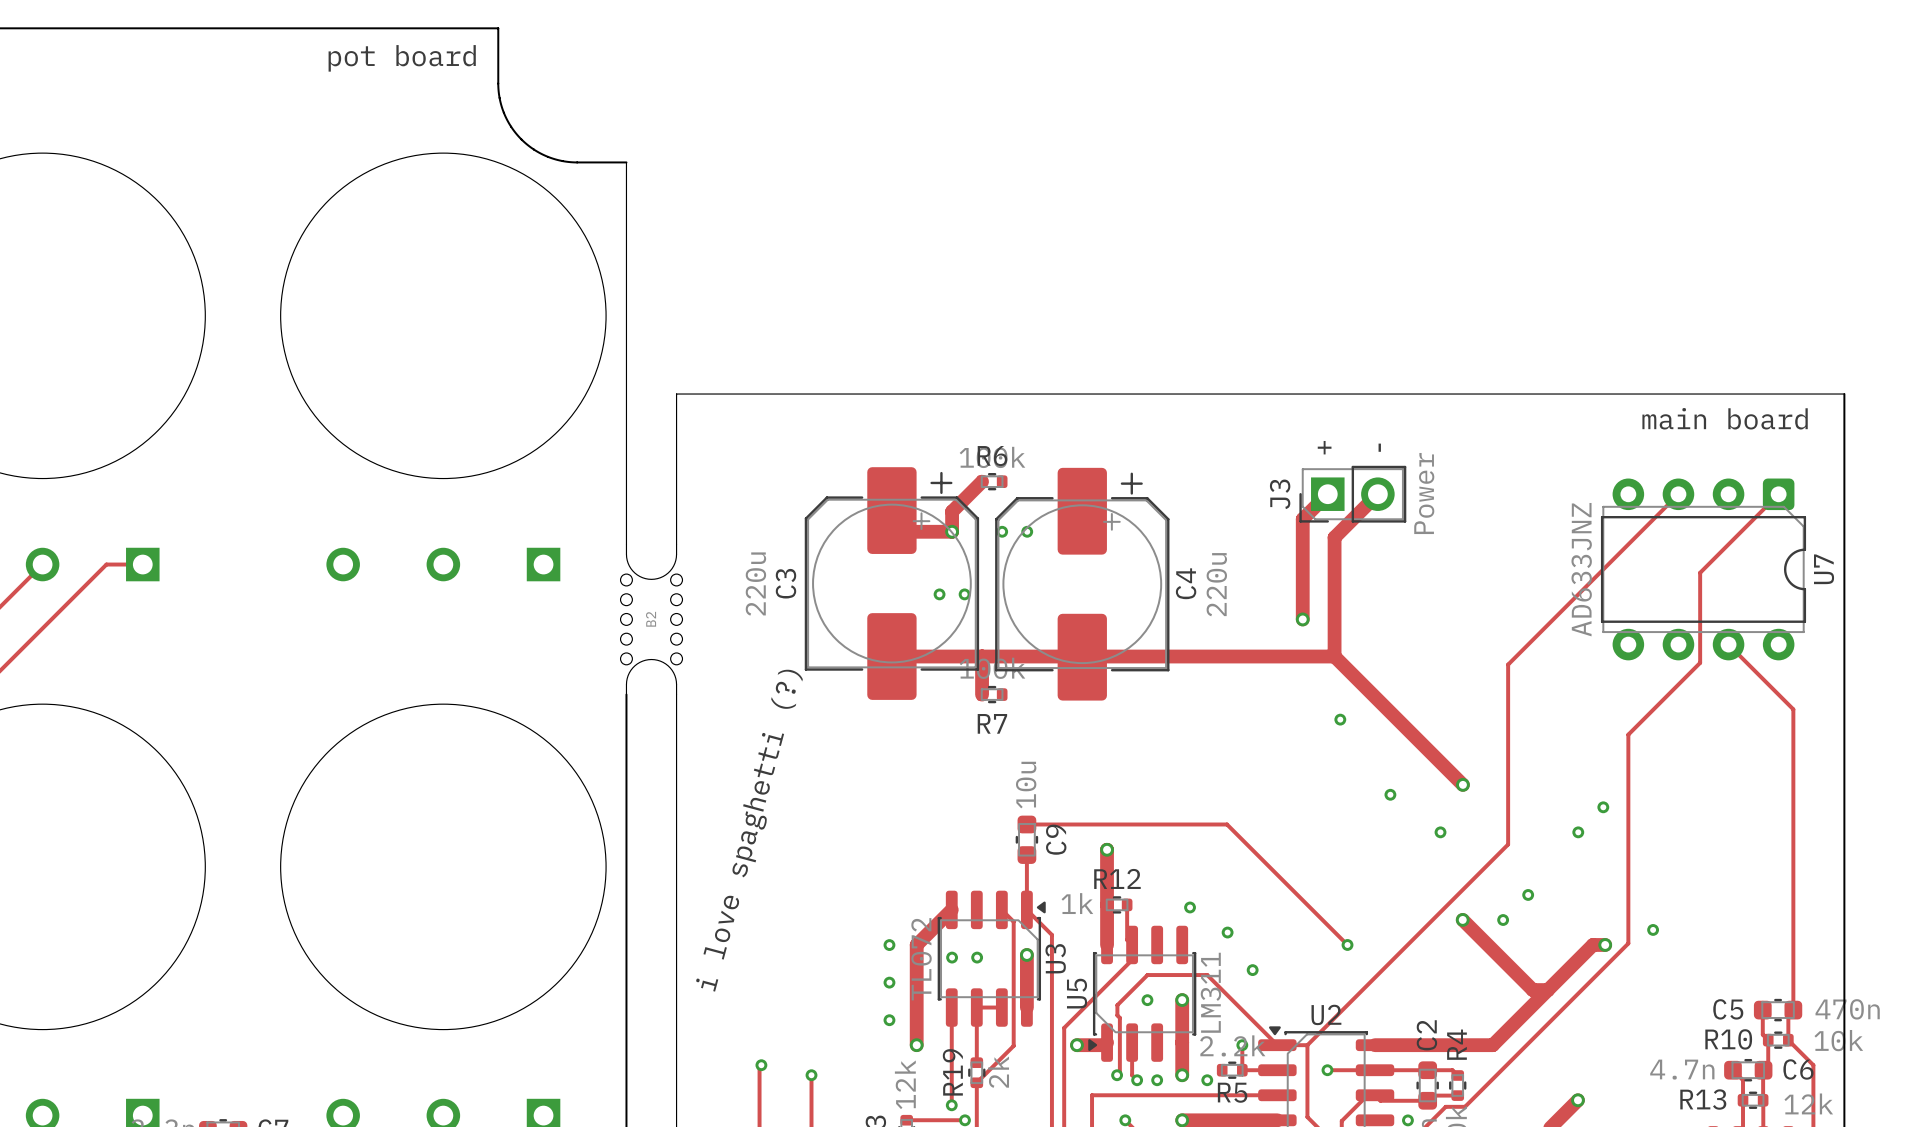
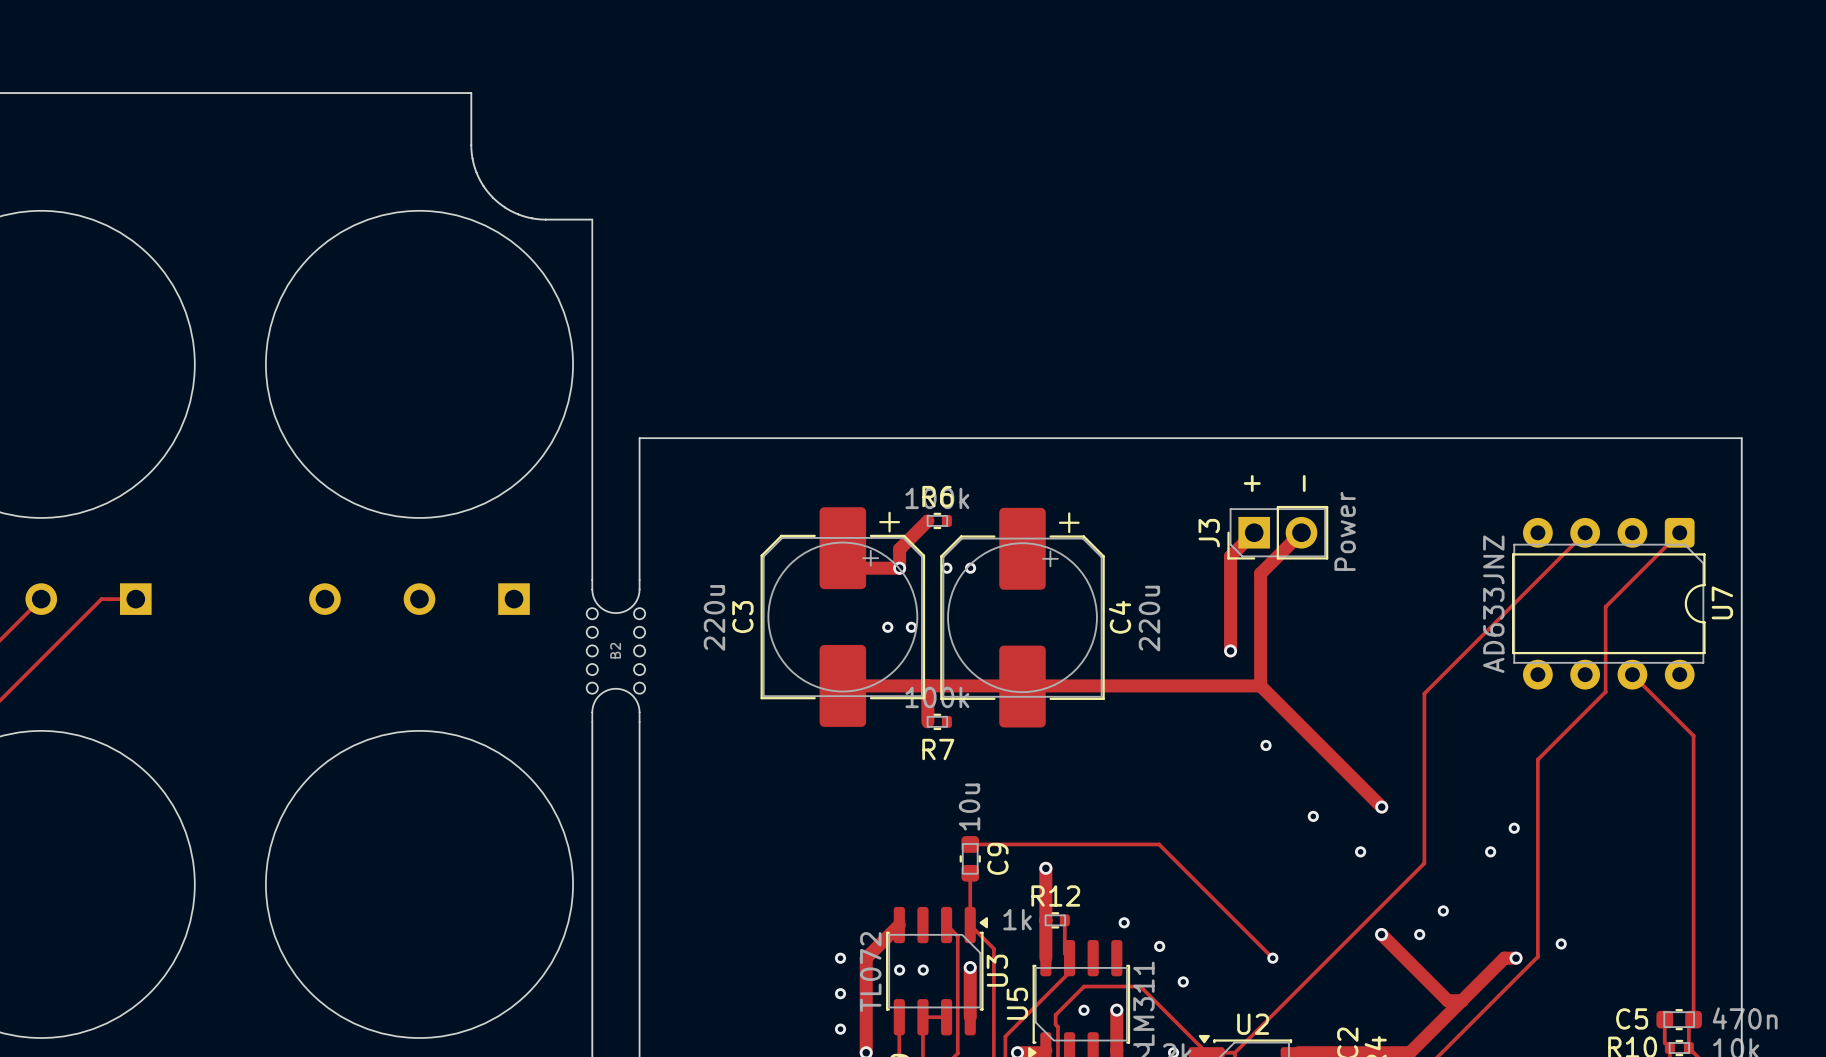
text: pot board (402, 58) -> none
text: main board (1725, 418) -> none
text: i love spaghetti (?) (749, 830) -> none

